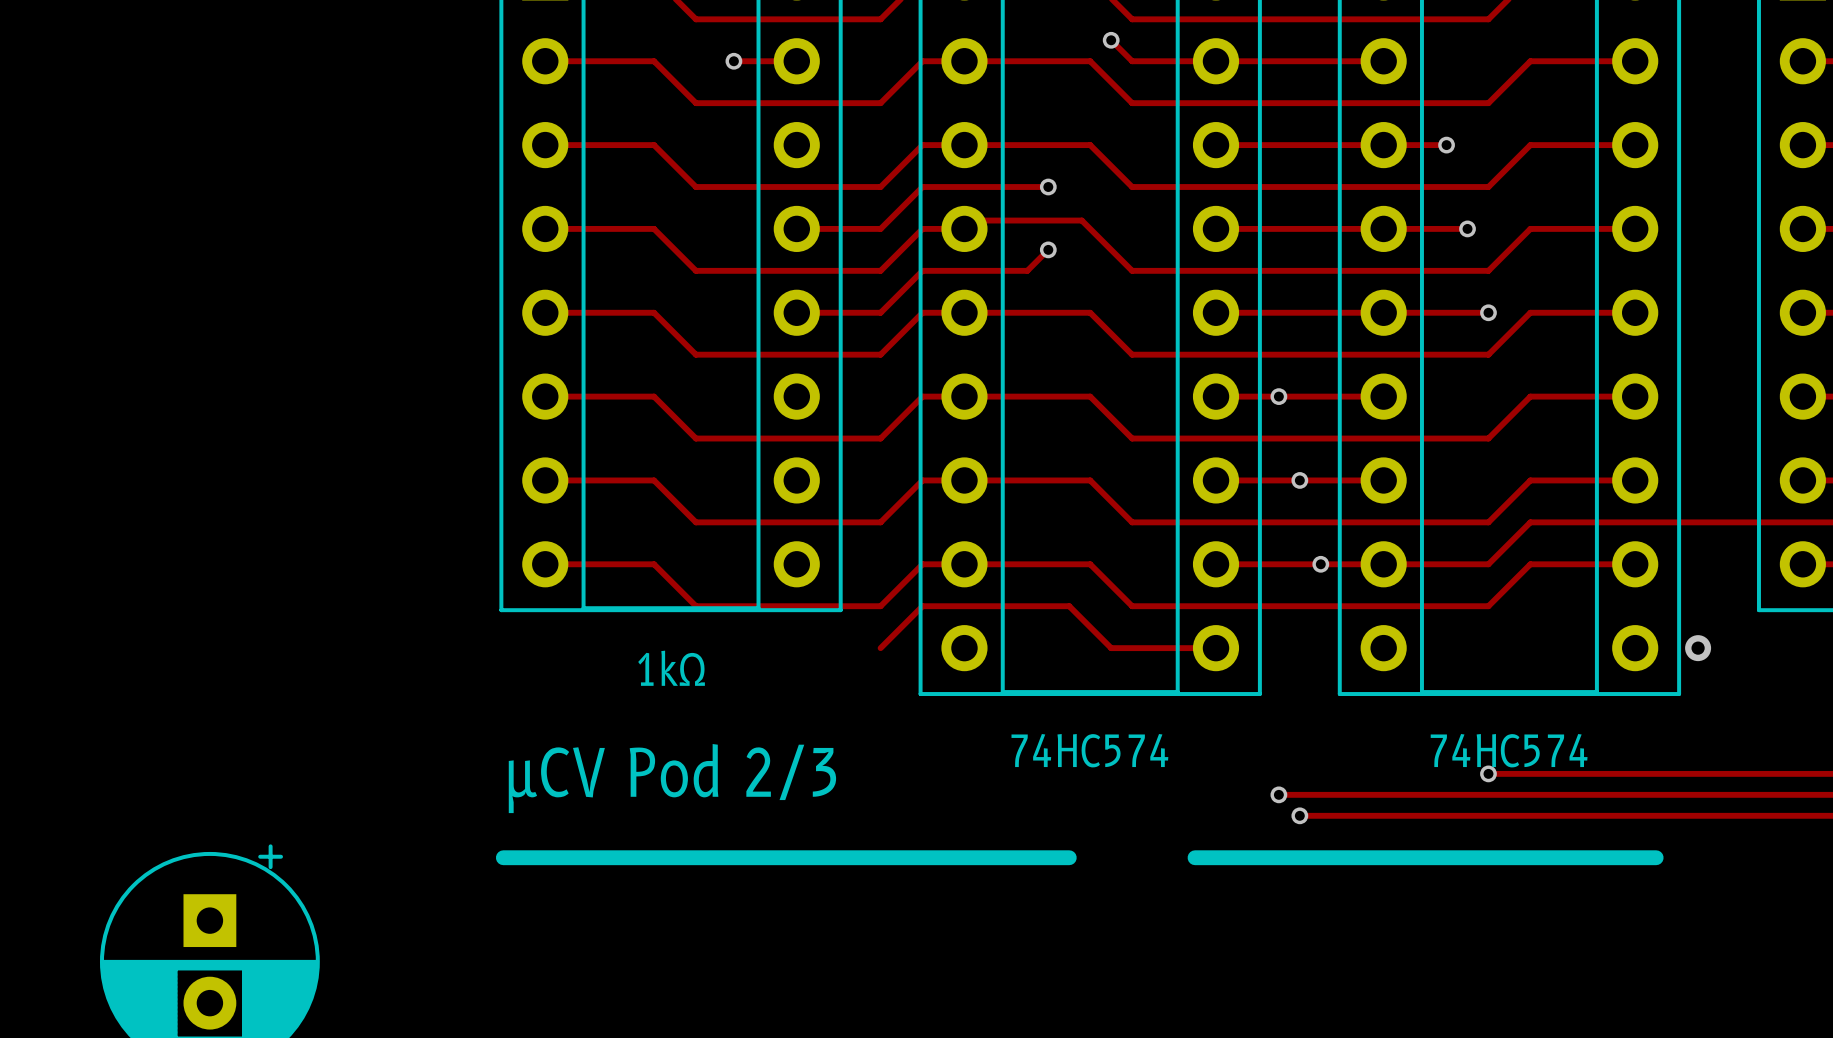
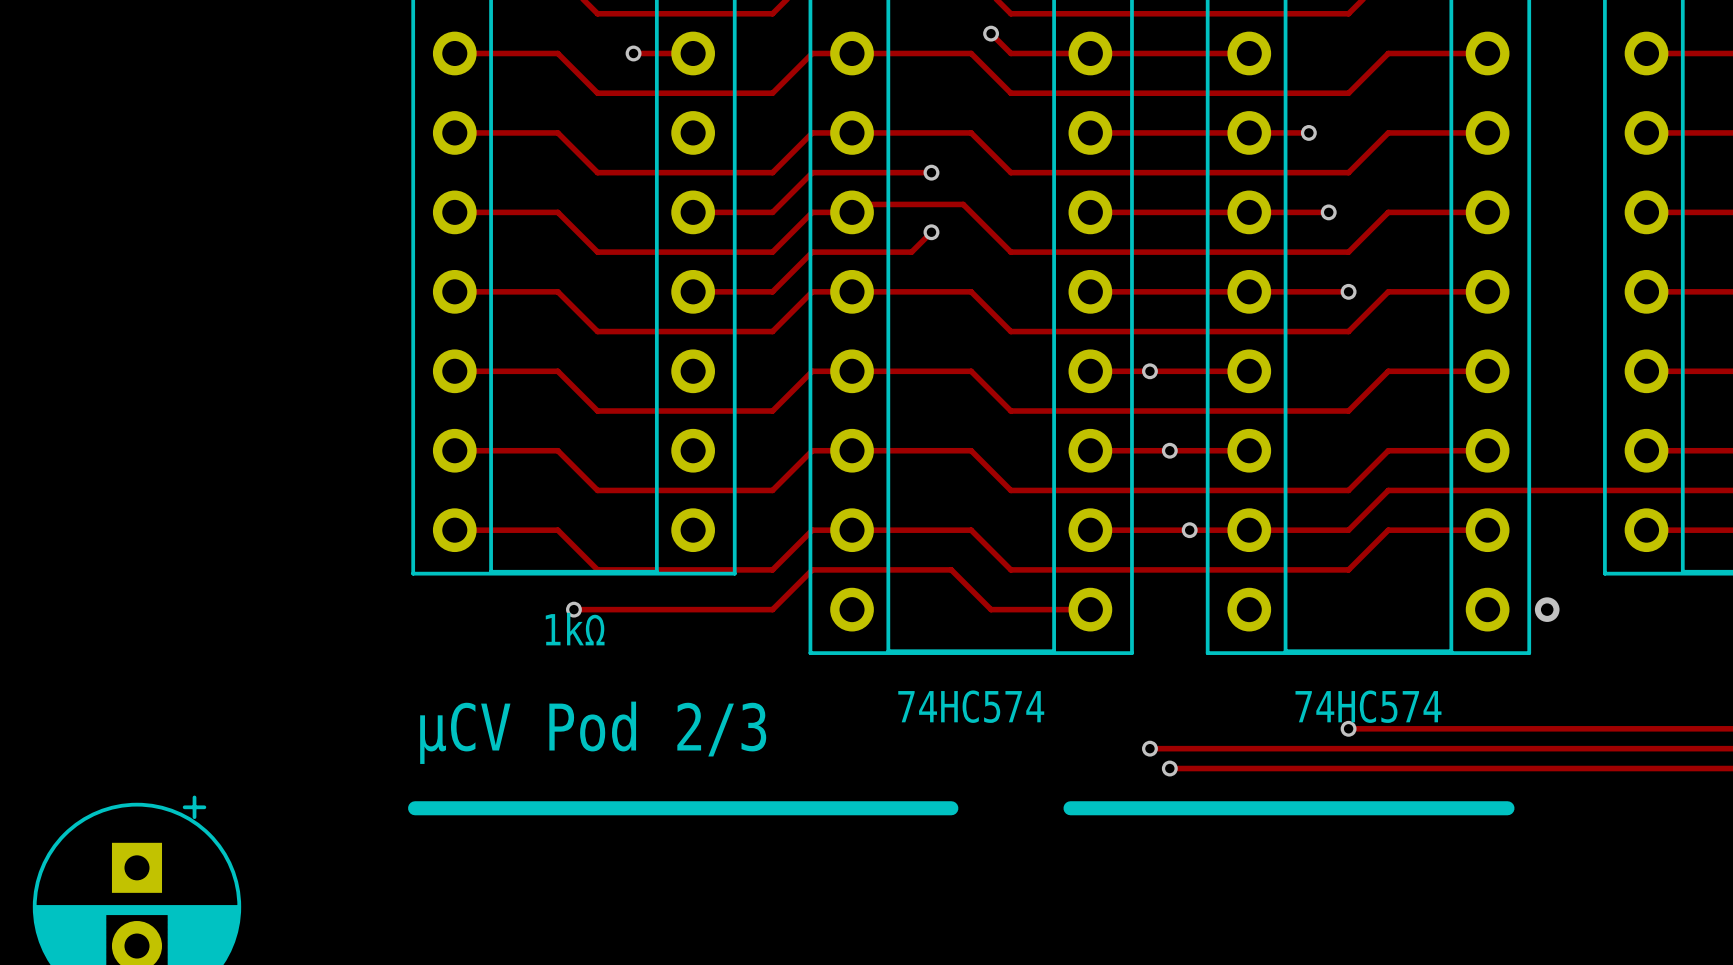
track: none -> (573, 609) (772, 609)
via: none -> (573, 609)

